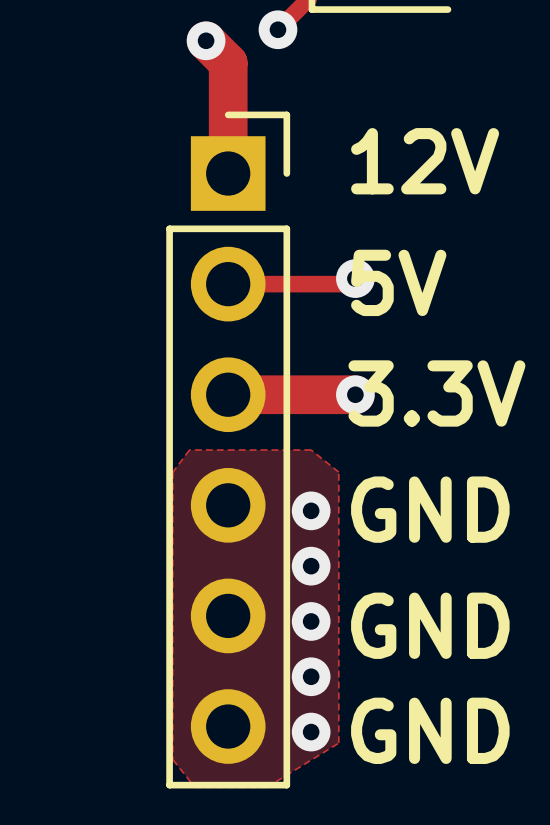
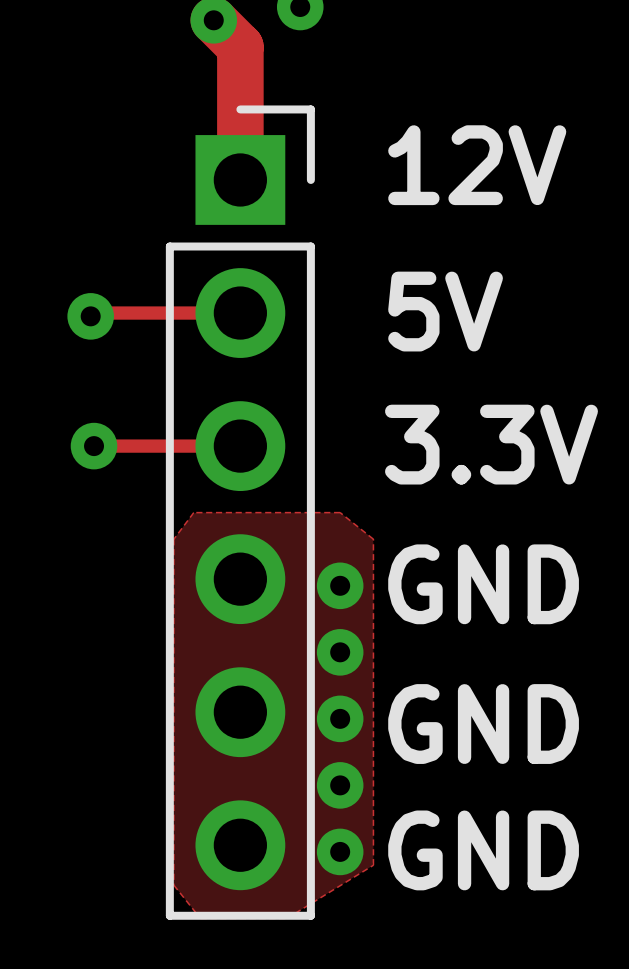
track: (355, 278) (349, 284) (228, 284) -> (90, 316) (94, 313) (240, 313)
via: (355, 278) -> none
via: none -> (90, 316)
via: none -> (94, 446)
track: (228, 394) (355, 394) -> (240, 446) (94, 446)
via: (355, 394) -> none

